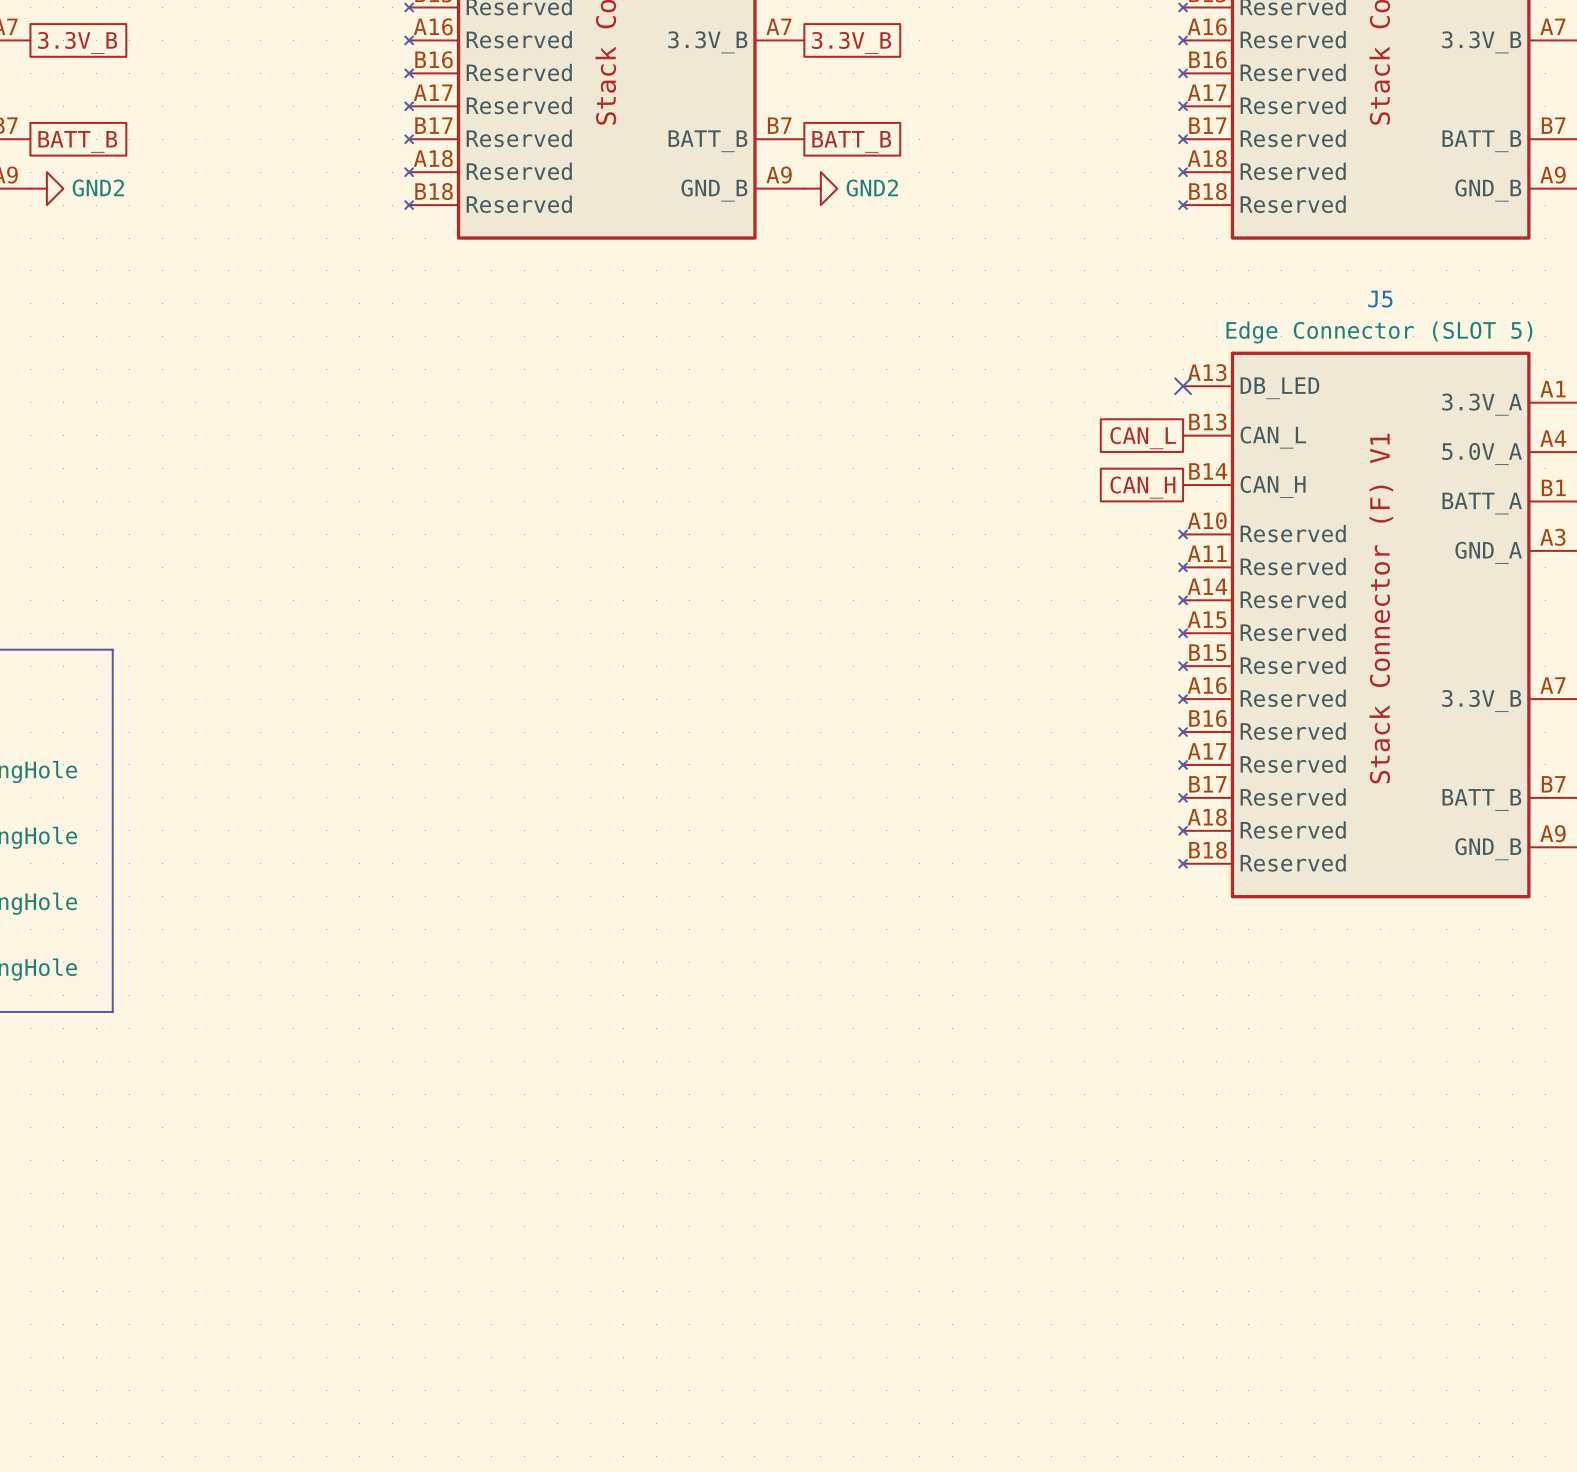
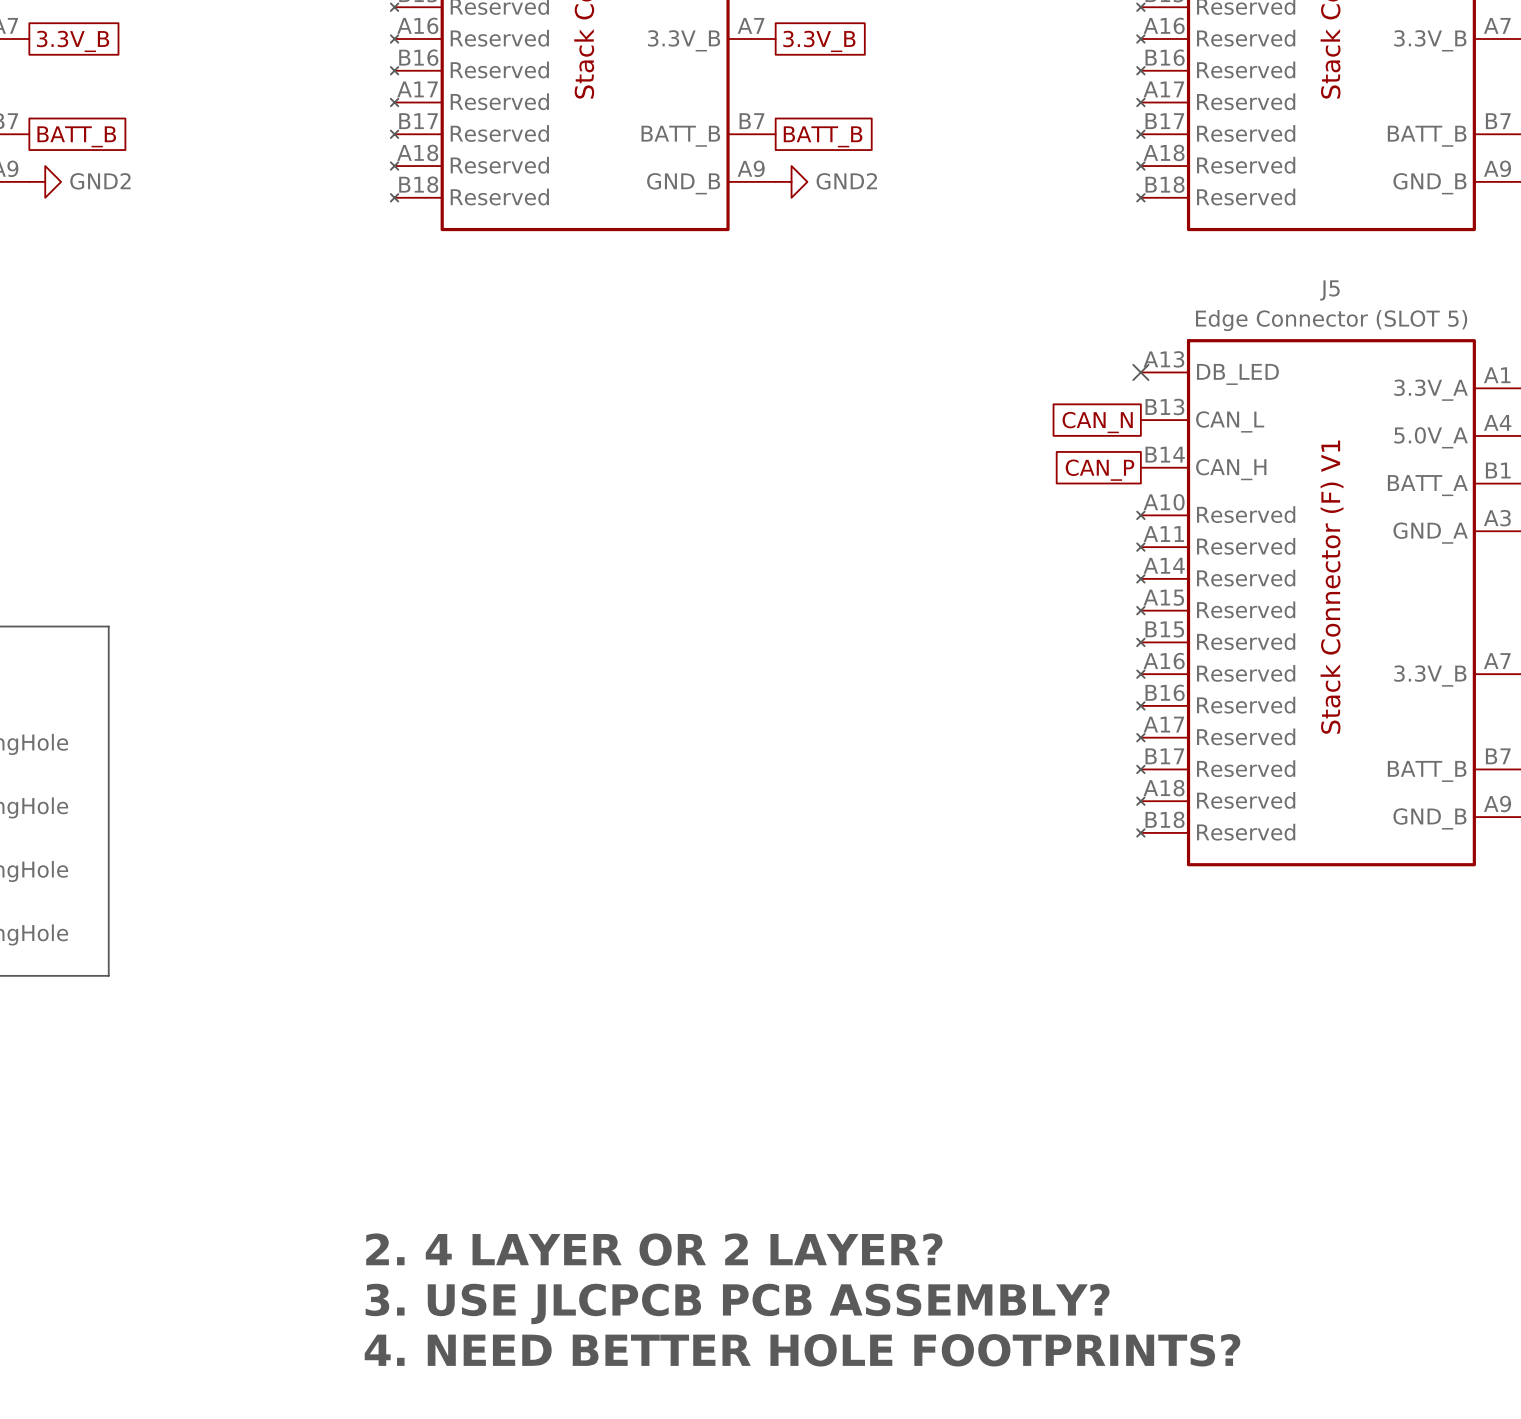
global label: CAN_L (1143, 438) -> CAN_N (1097, 422)
global label: CAN_H (1142, 487) -> CAN_P (1099, 470)
text: none -> 2. 4 LAYER OR 2 LAYER? (654, 1249)
text: none -> 3. USE JLCPCB PCB ASSEMBLY? (737, 1303)
text: none -> 4. NEED BETTER HOLE FOOTPRINTS? (802, 1350)

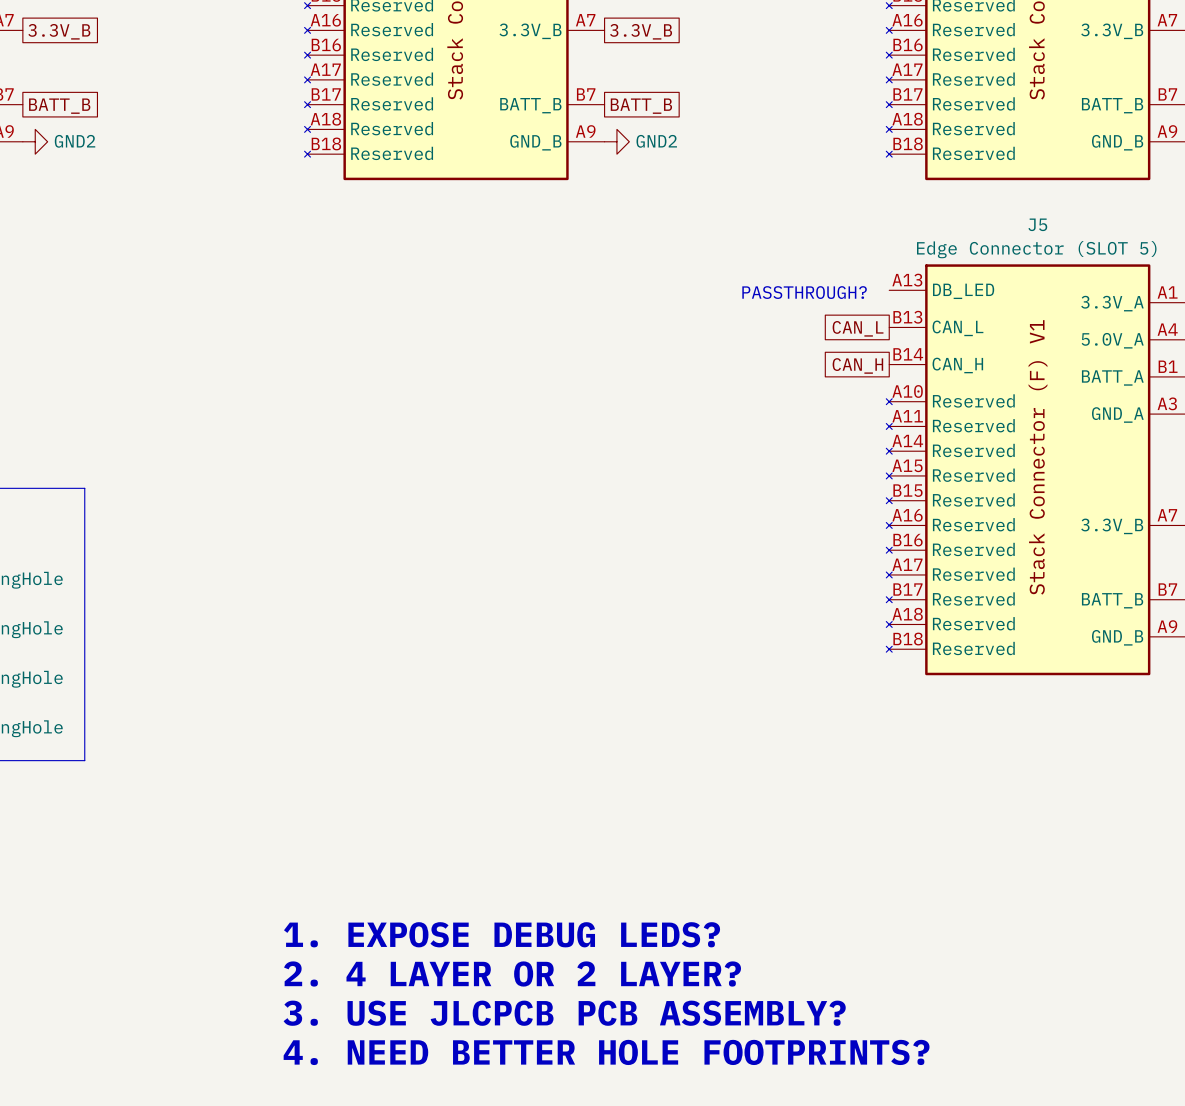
no-connect mark: (1140, 372) -> none
text: none -> PASSTHROUGH? (804, 292)
global label: CAN_N (1097, 422) -> CAN_L (858, 328)
global label: CAN_P (1099, 470) -> CAN_H (857, 365)
text: none -> 1. EXPOSE DEBUG LEDS? (502, 934)

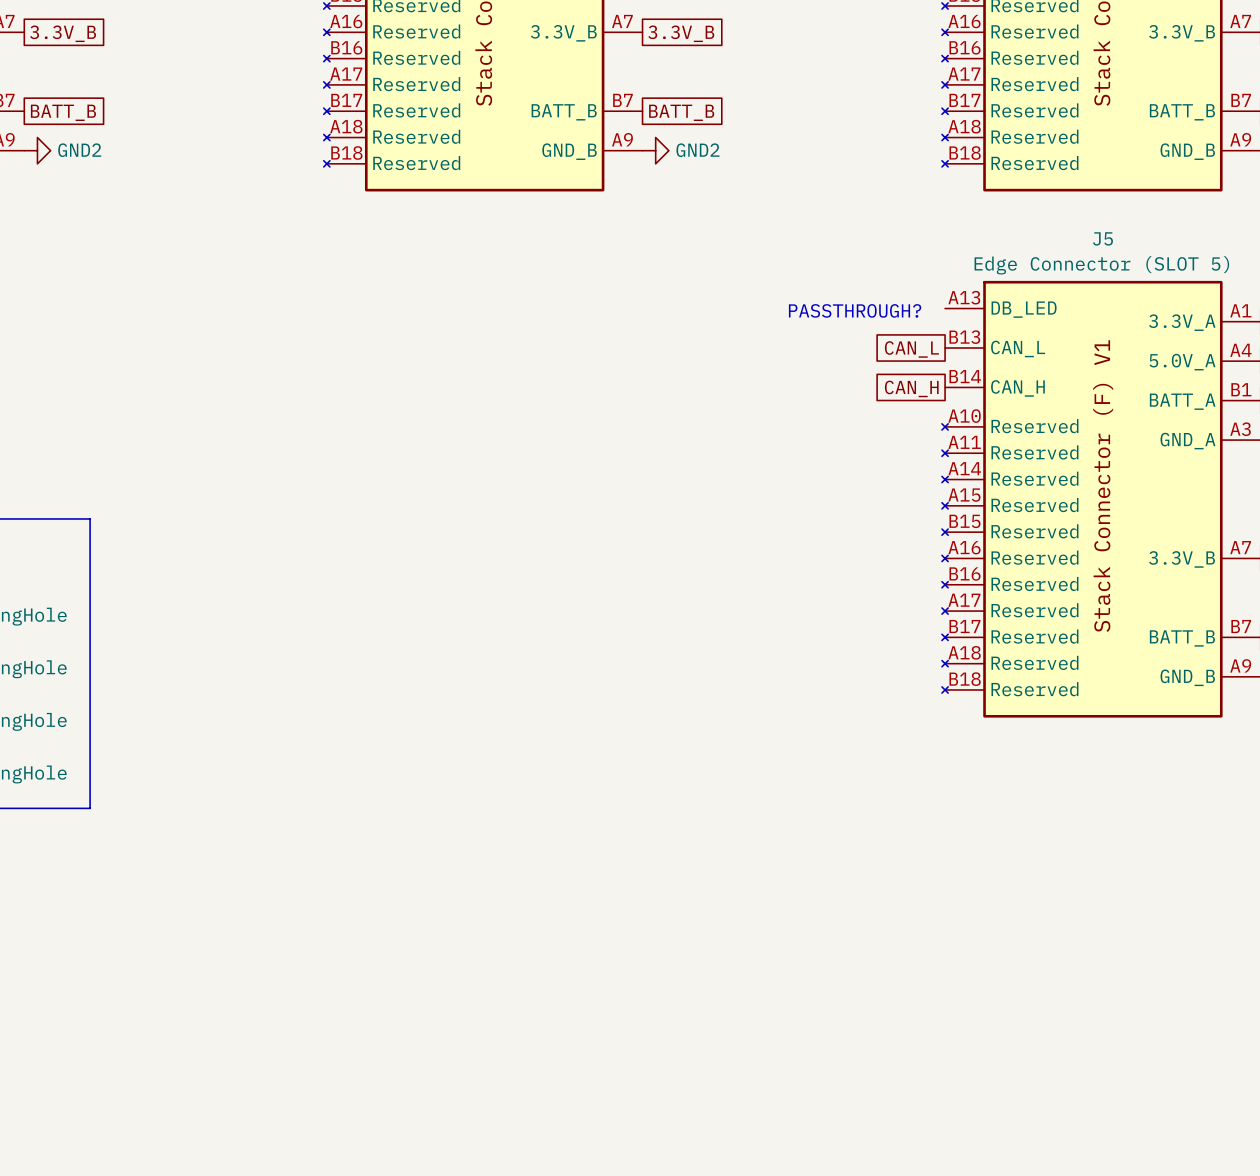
text: 1. EXPOSE DEBUG LEDS? (502, 934) -> none
text: 2. 4 LAYER OR 2 LAYER? (512, 973) -> none
text: 3. USE JLCPCB PCB ASSEMBLY? (564, 1013) -> none
text: 4. NEED BETTER HOLE FOOTPRINTS? (606, 1052) -> none

